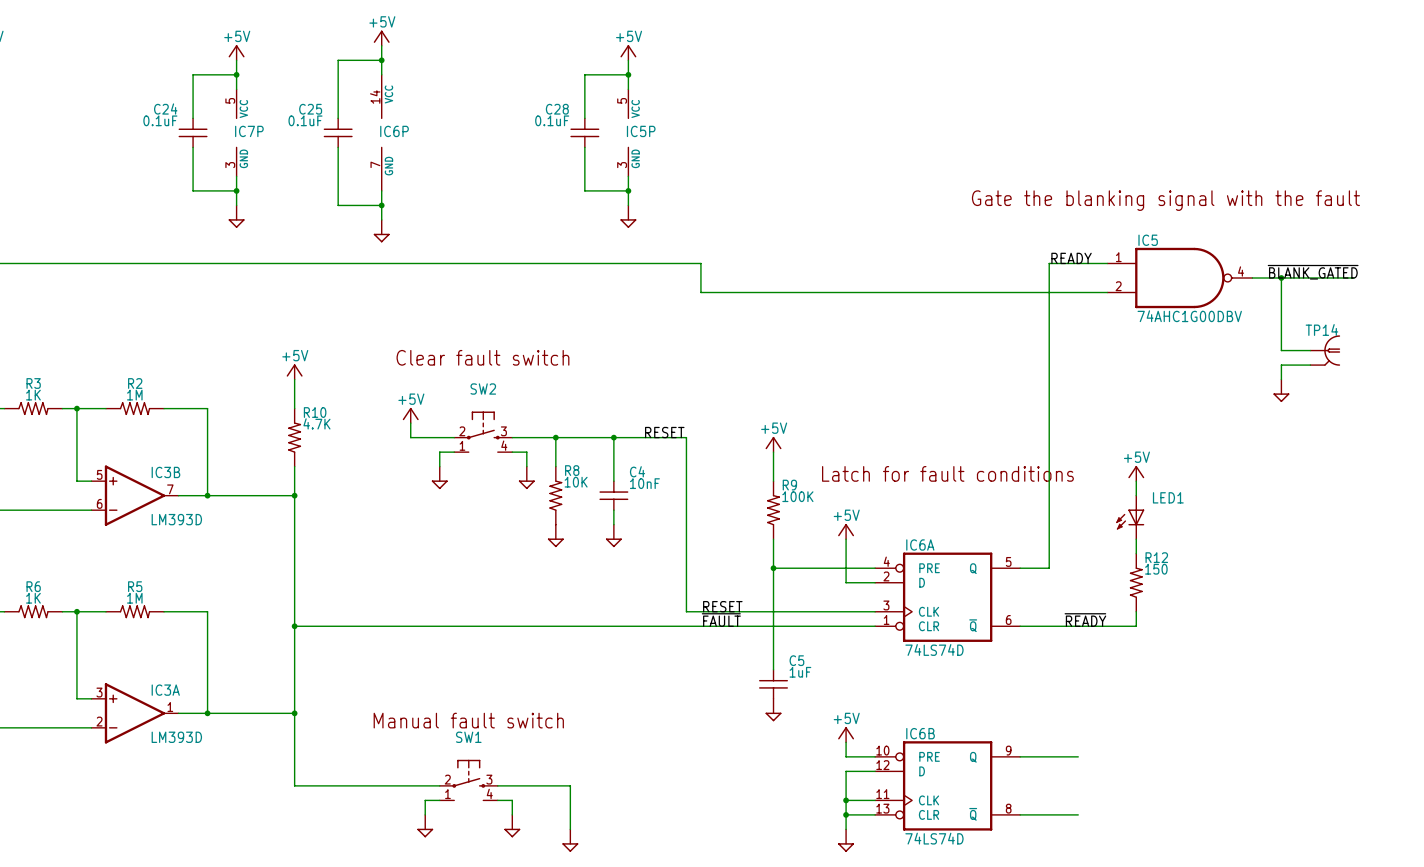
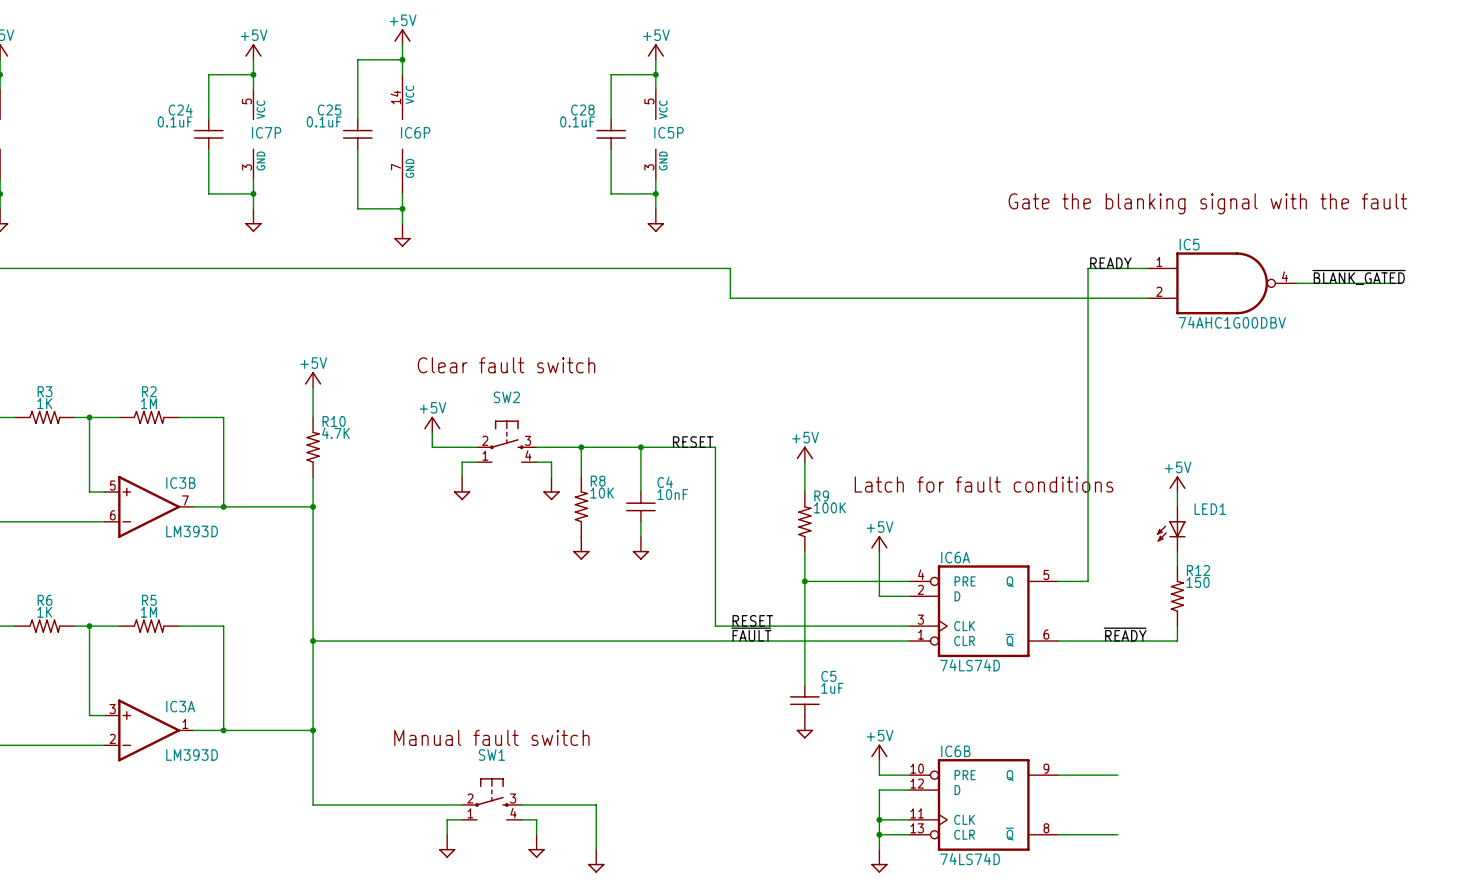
wire: (1281, 278) (1281, 350) (1310, 350) -> none
junction: (1281, 278) -> none
TP14: (1325, 350) -> none
wire: (1310, 365) (1281, 365) (1281, 379) -> none
power symbol: (1281, 390) -> none

